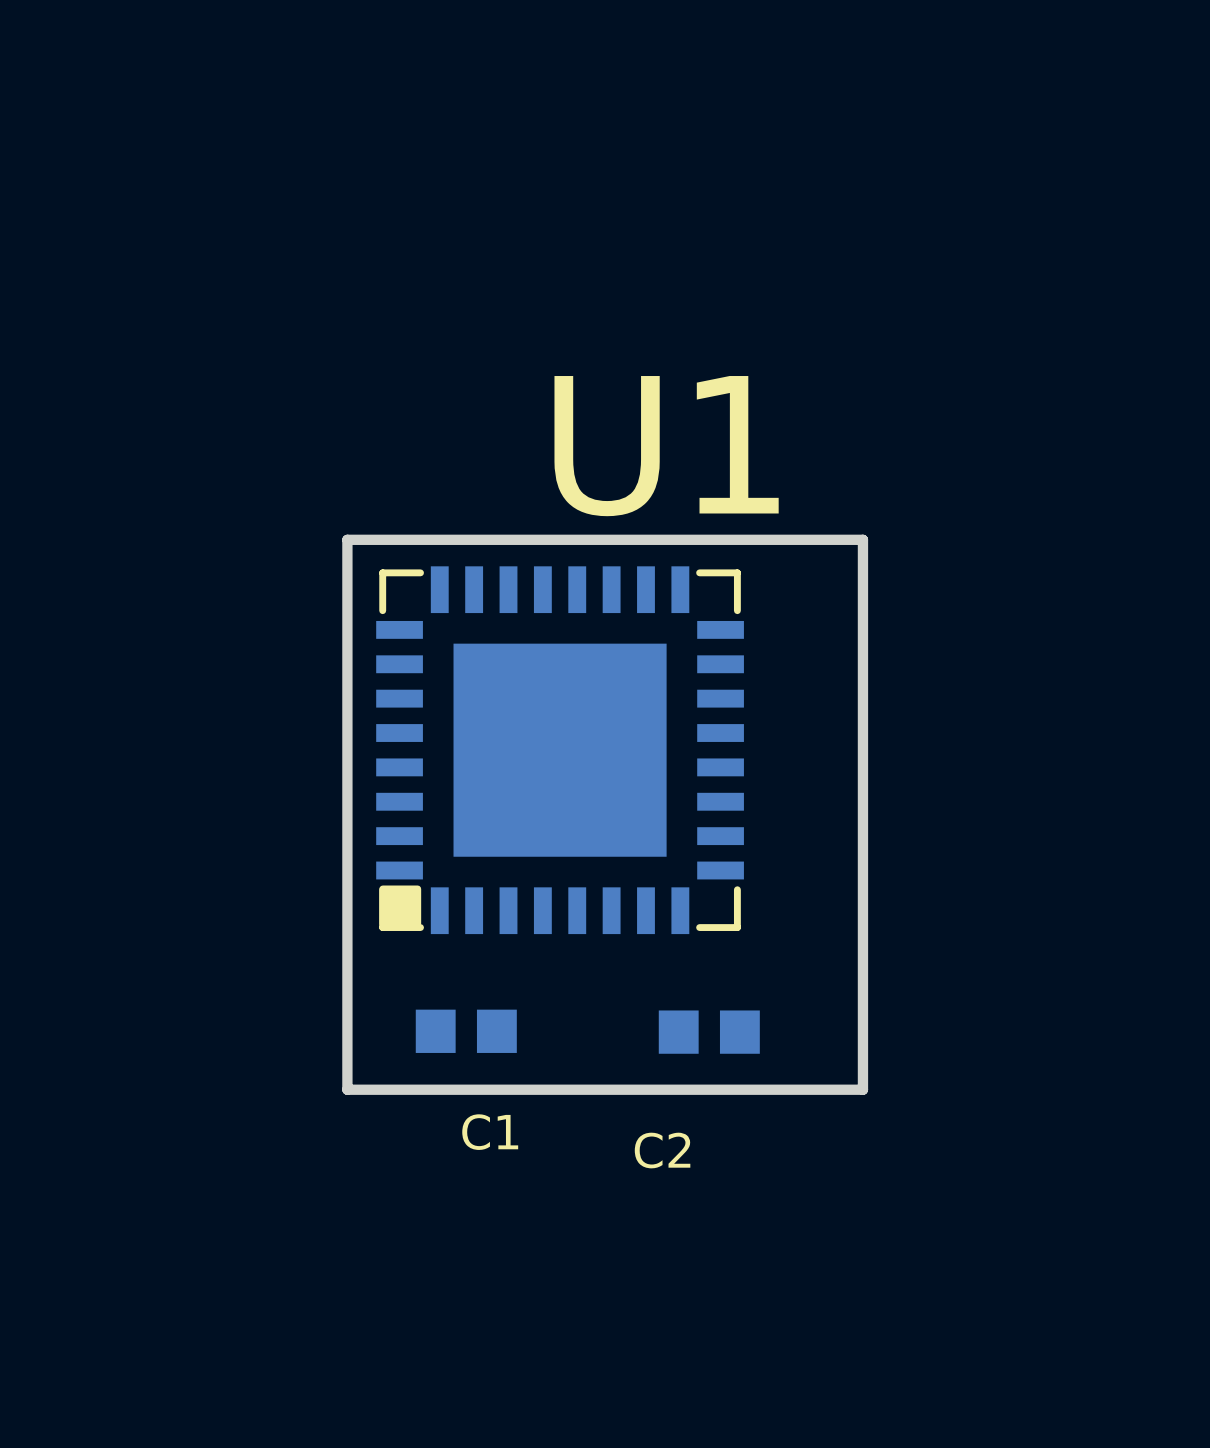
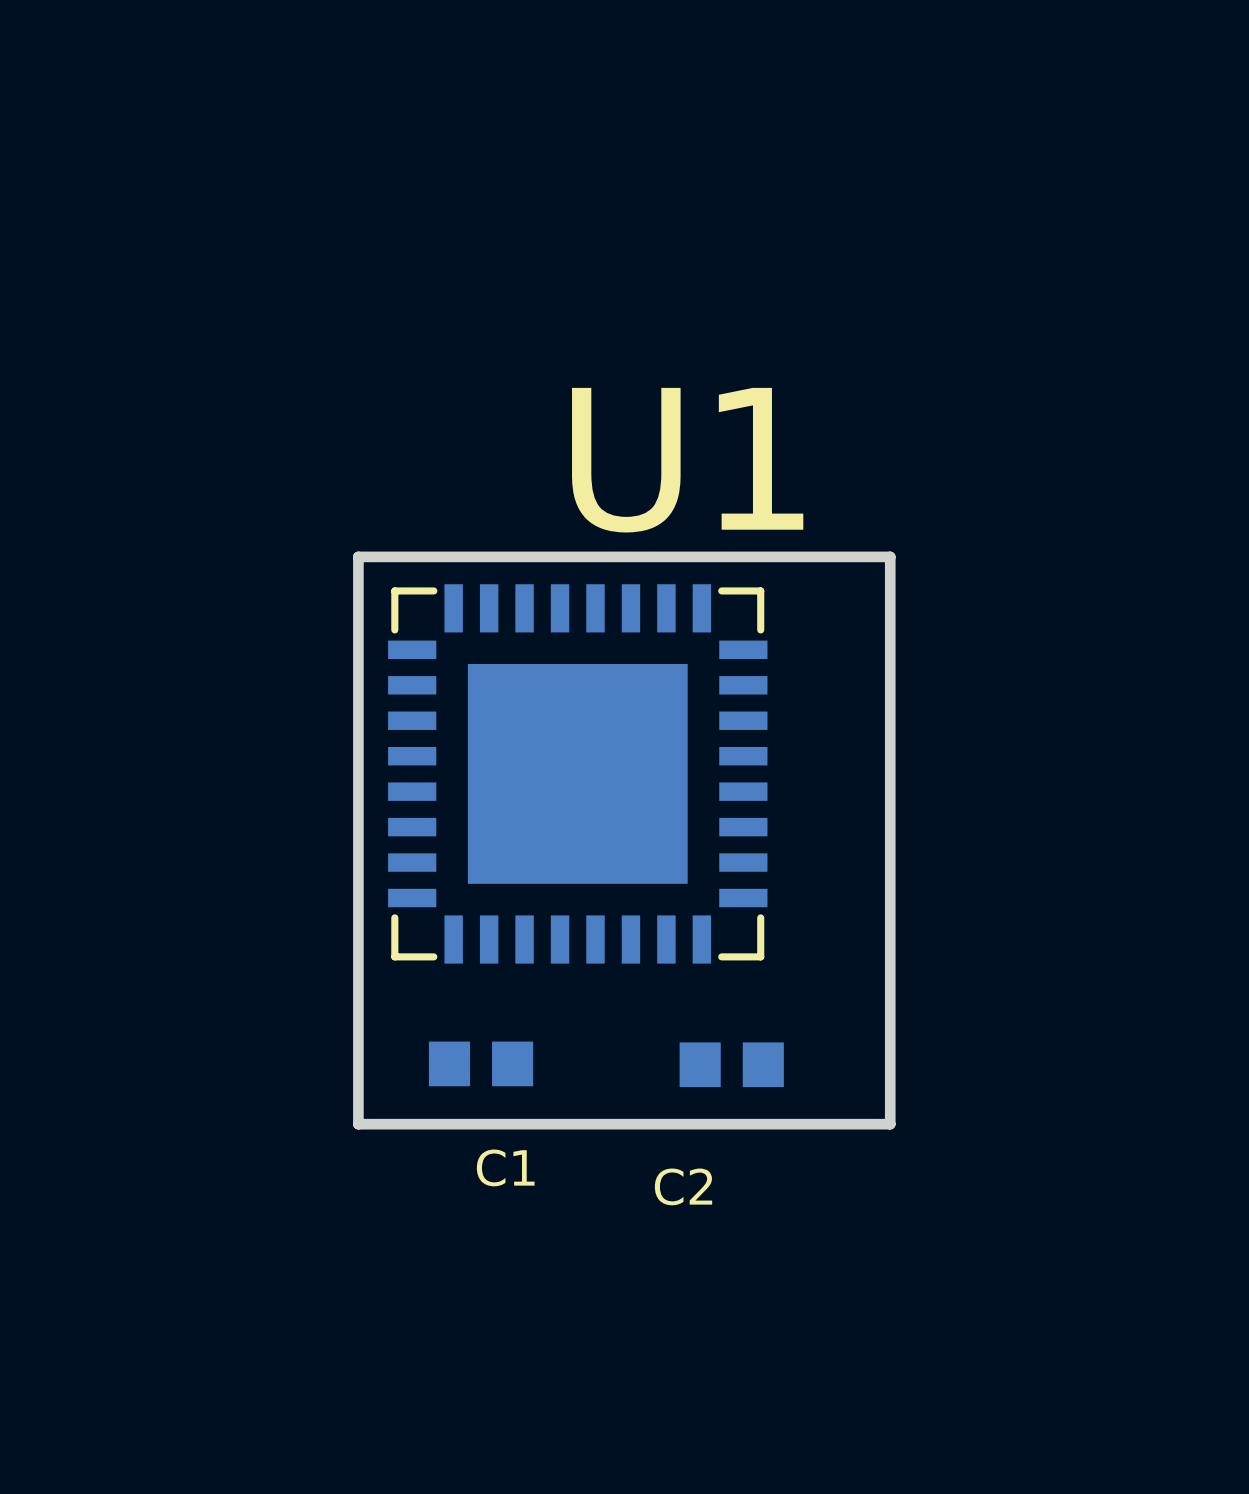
drawing: [379, 885, 422, 928] -> none

